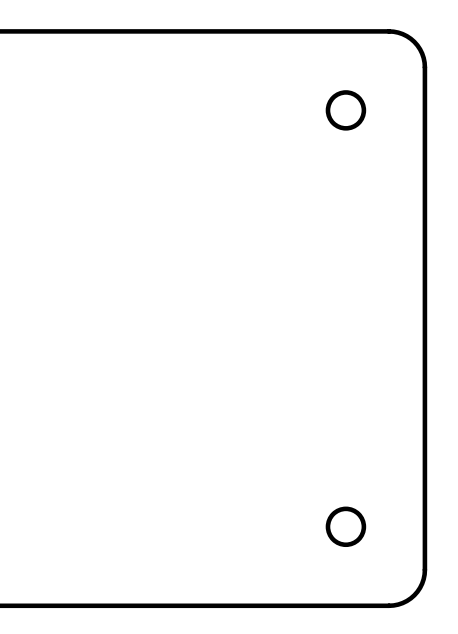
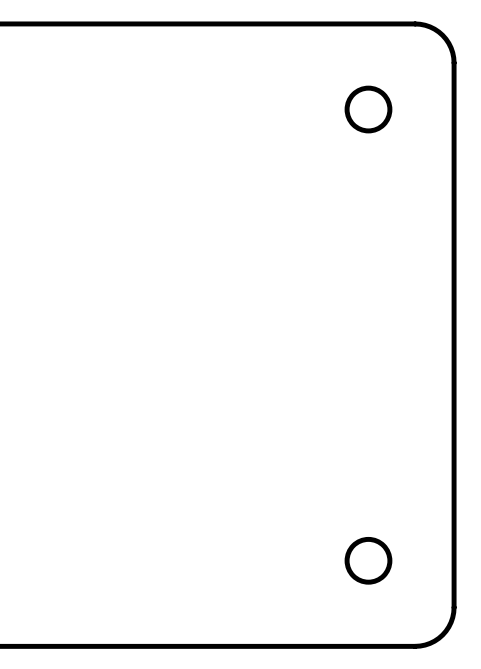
round board edge: none -> [344, 85, 393, 134]
round board edge: [325, 90, 367, 131] -> none
round board edge: none -> [344, 536, 393, 585]
round board edge: [325, 506, 367, 548] -> none

